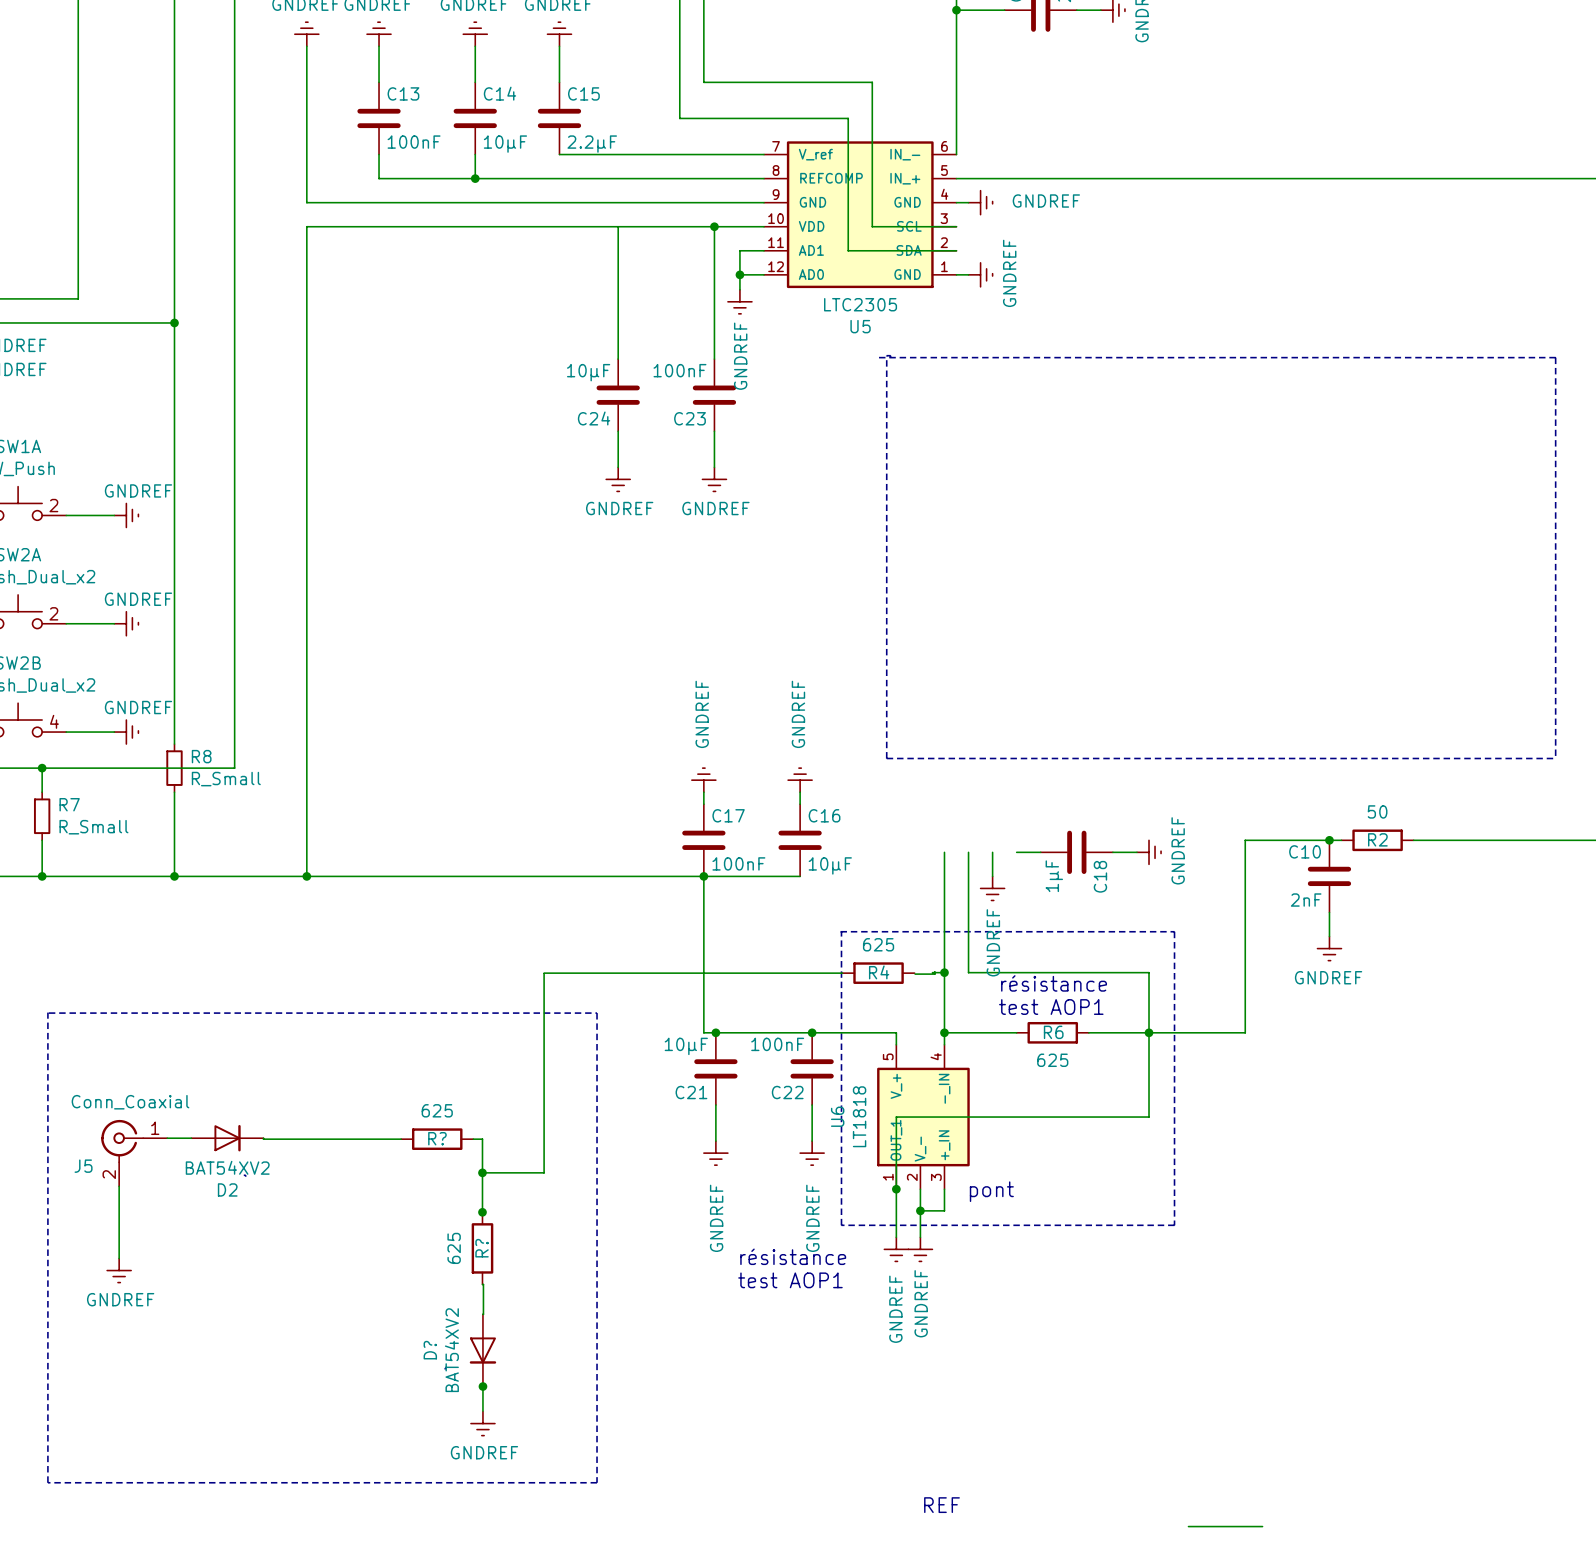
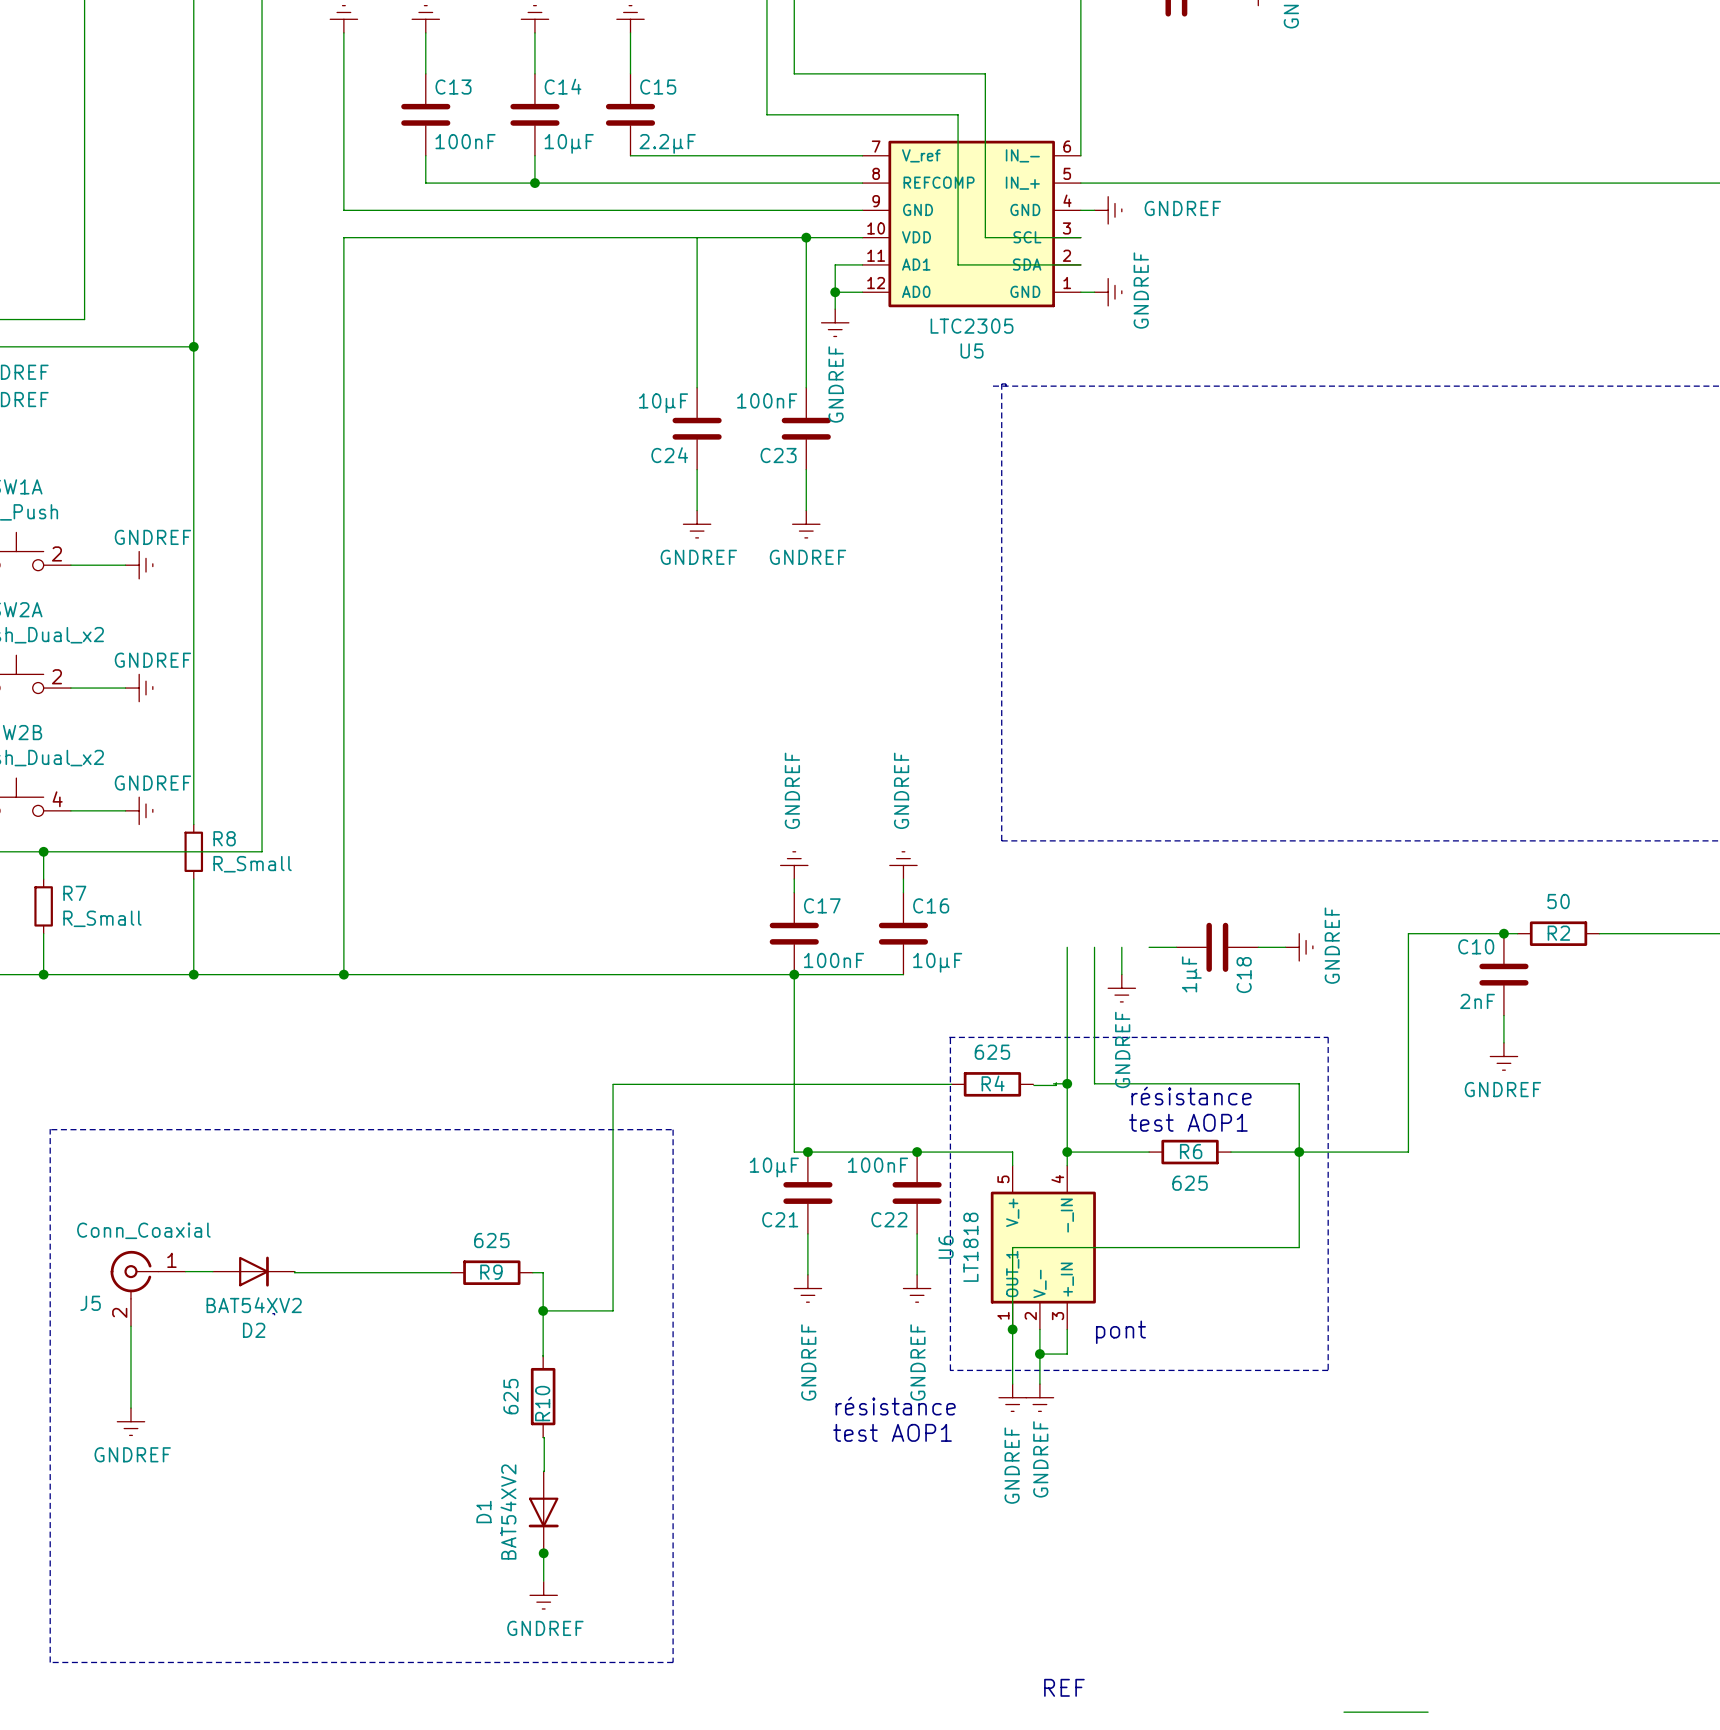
R? name: R? (437, 1138) -> R9 (491, 1272)
junction: (482, 1212) -> none
R? name: R? (482, 1248) -> R10 (542, 1403)
D? name: D? (430, 1350) -> D1 (483, 1512)

